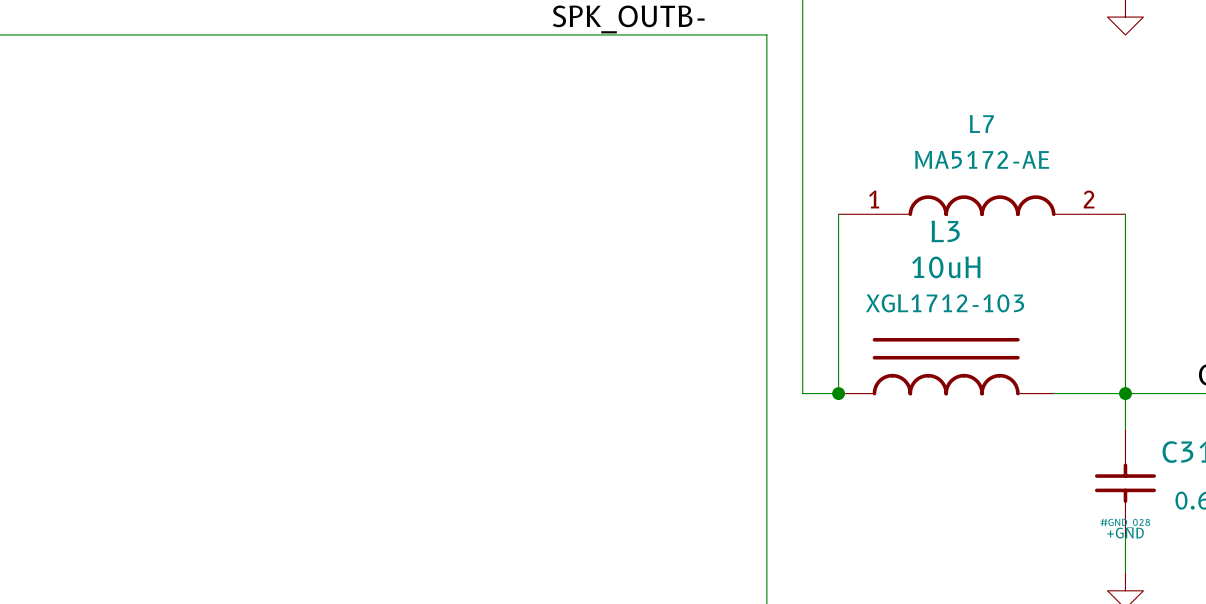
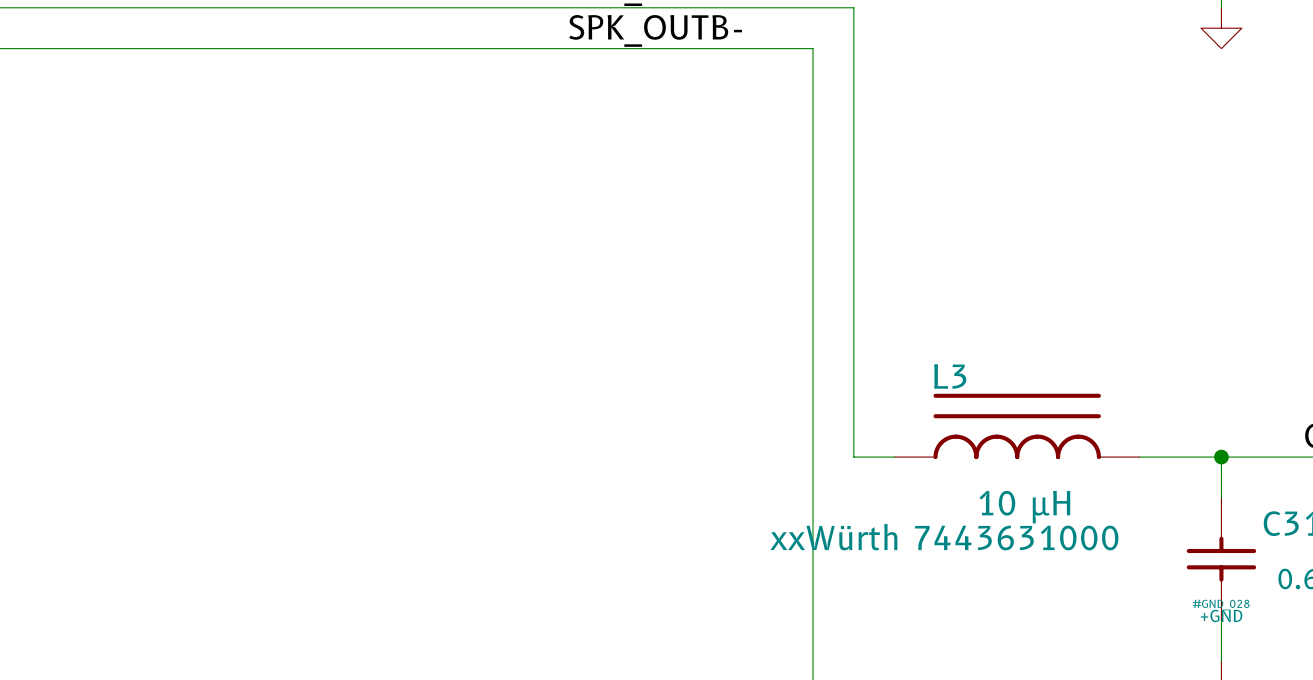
L7: MA5172-AE (982, 205) -> none
wire: (838, 214) (838, 393) -> none
wire: (1125, 214) (1125, 393) -> none
L3 name position: L3 (945, 231) -> L3 (950, 376)
L3 value: 10uH (946, 267) -> 10 µH (1024, 507)
L3 text: XGL1712-103 (945, 303) -> none
junction: (838, 393) -> none
L3 text: none -> xxWürth 7443631000 (944, 537)

